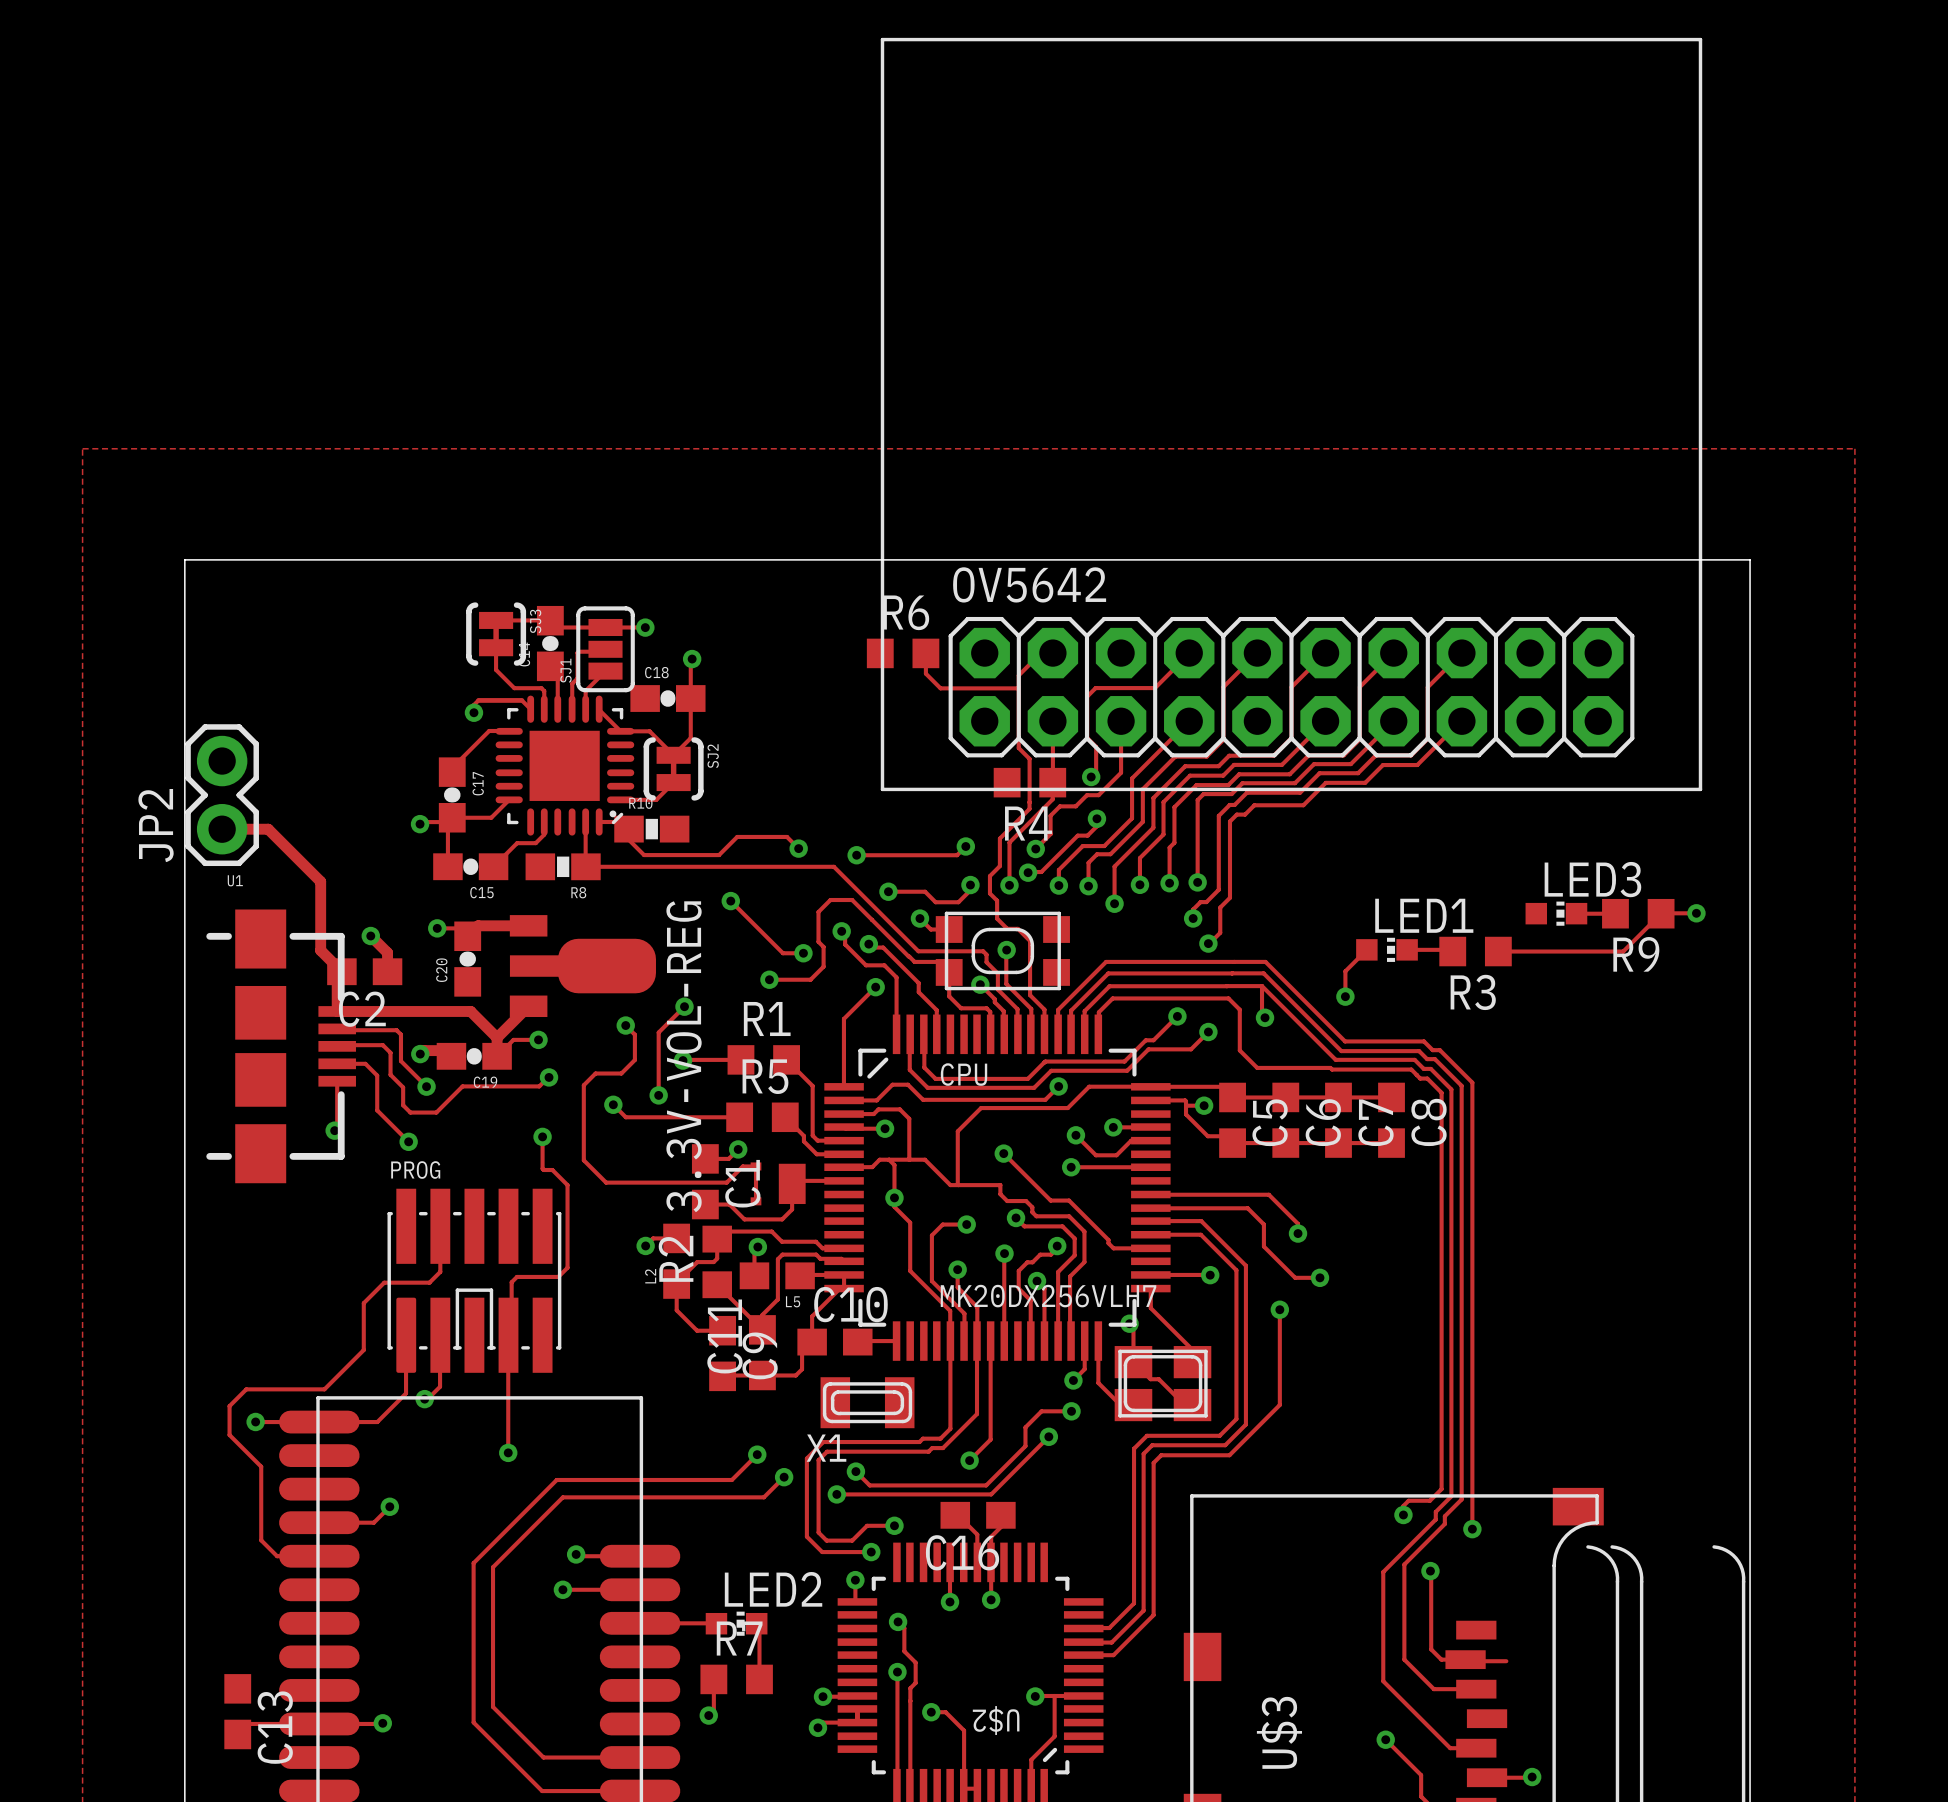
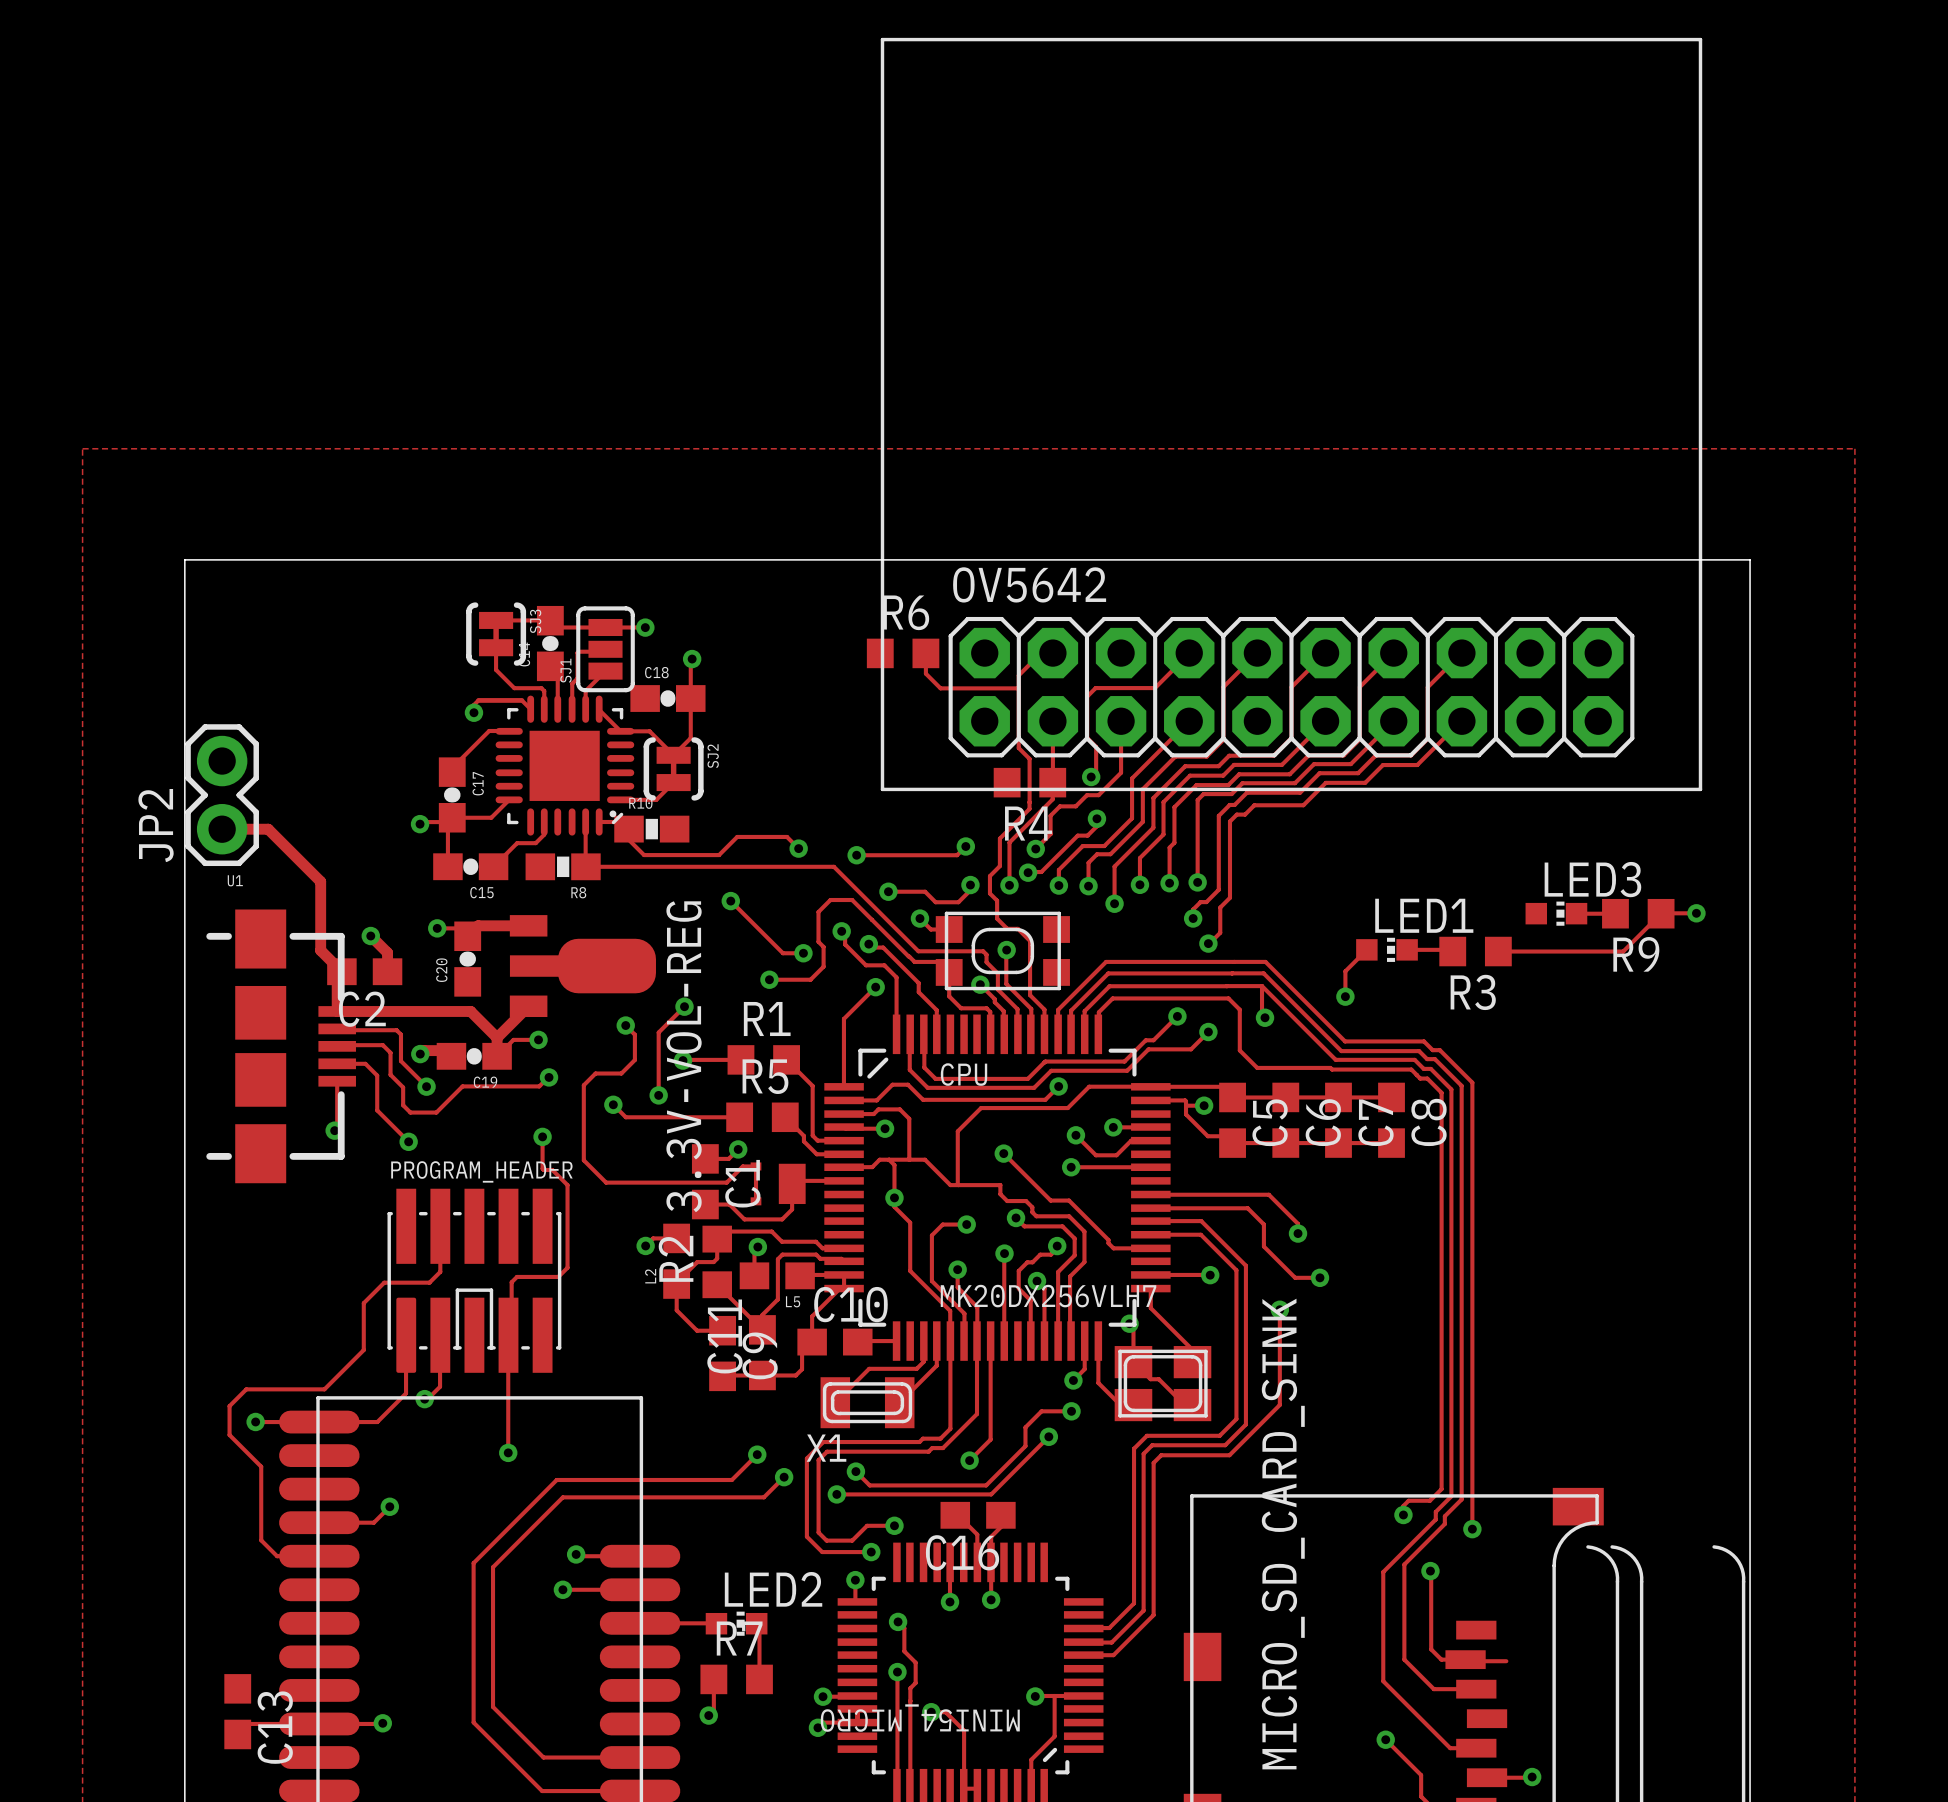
PROG name: PROG (415, 1170) -> PROGRAM_HEADER (481, 1171)
track: none -> (923, 1341) (923, 1361) (916, 1368) (869, 1368) (835, 1402)
track: none -> (936, 1341) (936, 1365) (899, 1402)
U$2 name: U$2 (996, 1720) -> MINI54_MICRO (920, 1718)
U$3 name: U$3 (1279, 1732) -> MICRO_SD_CARD_SINK (1283, 1534)

